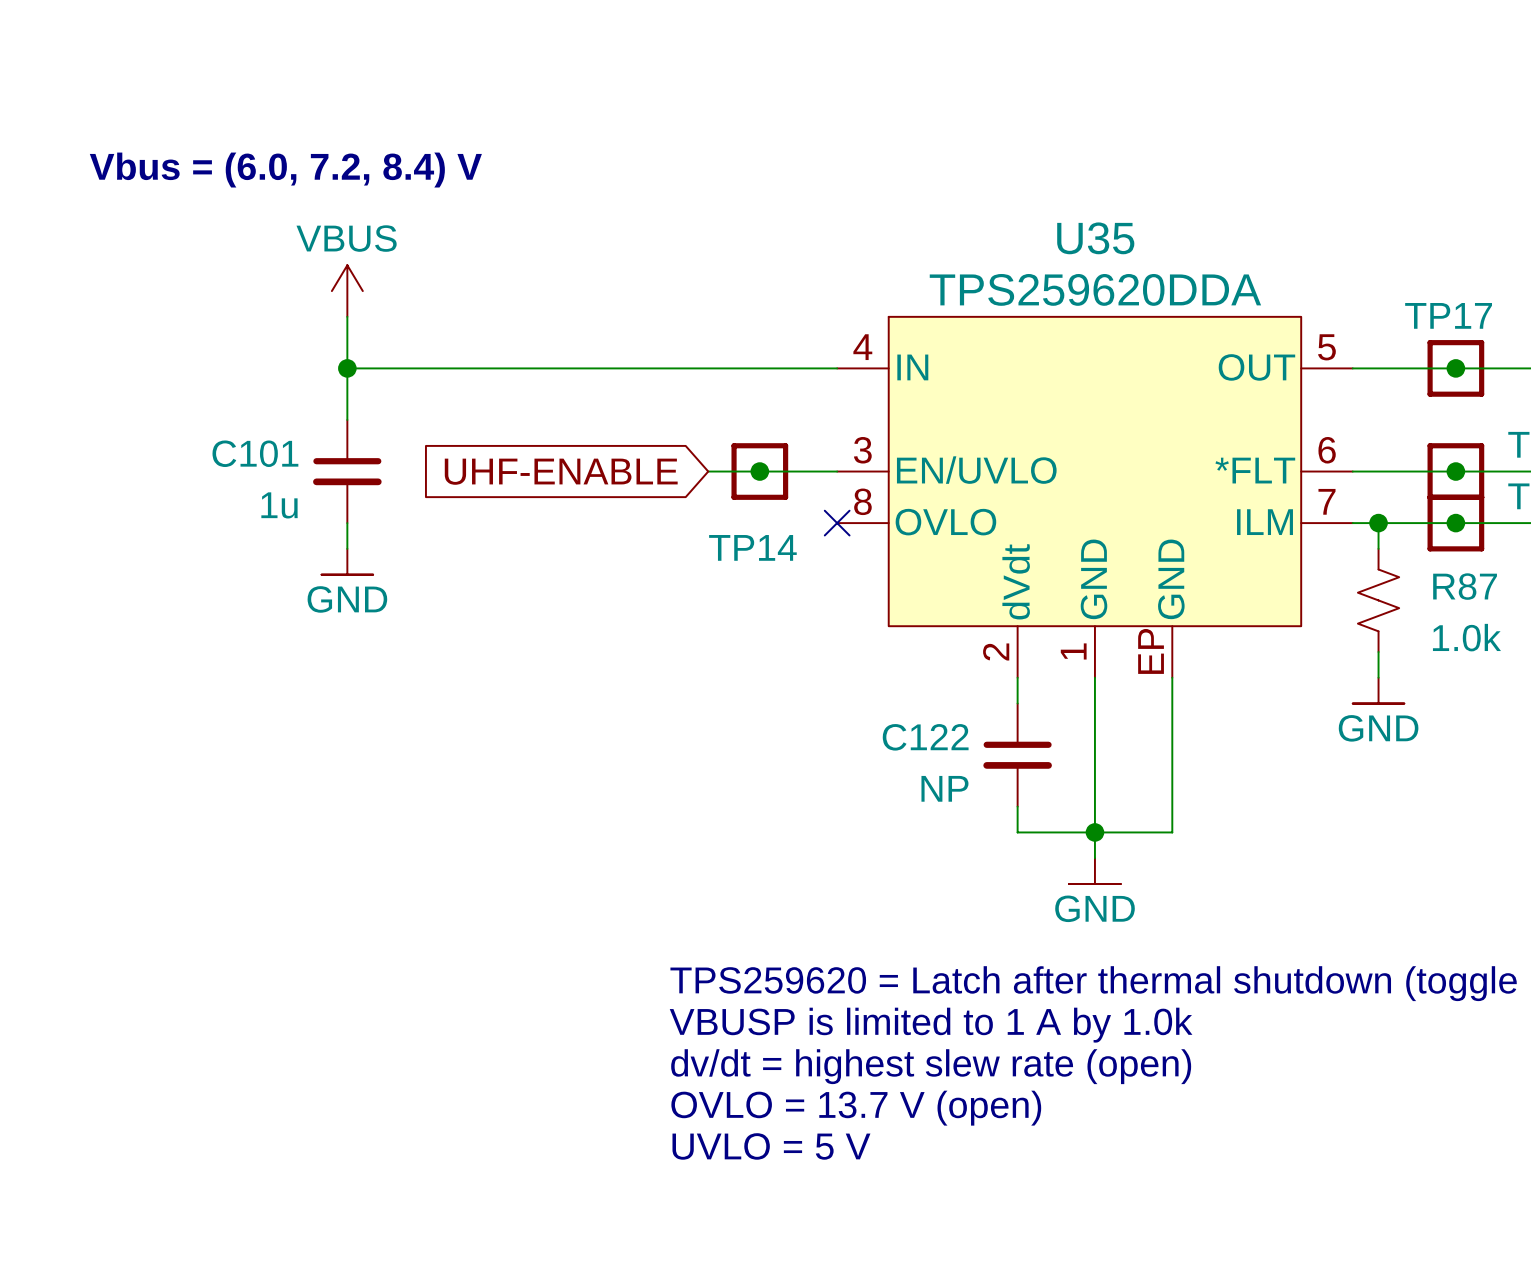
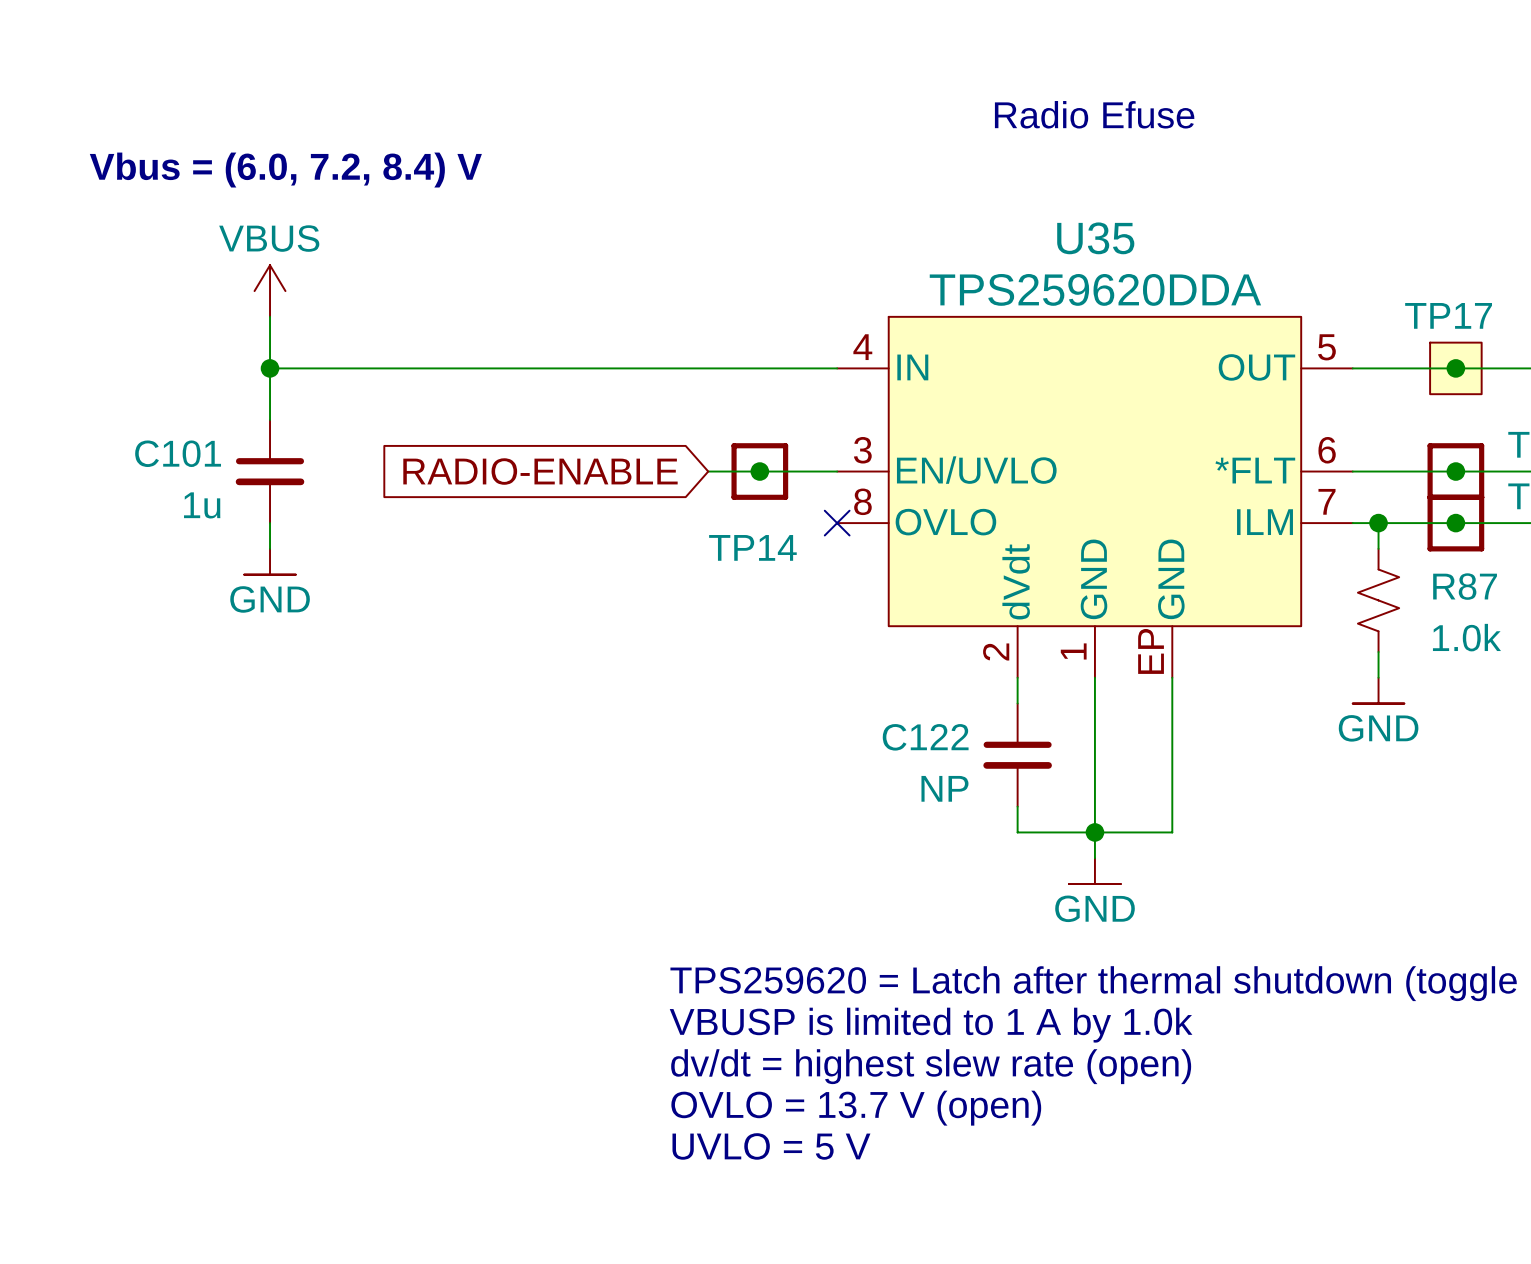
text: none -> Radio Efuse (1094, 114)
power symbol position: VBUS (347, 291) -> VBUS (270, 291)
wire: (347, 316) (347, 419) -> (270, 316) (270, 419)
TP17 symbol: [1427, 340, 1485, 397] -> [1430, 342, 1482, 395]
wire: none -> (270, 368) (347, 368)
junction position: (347, 368) -> (270, 368)
C101 position: (347, 471) -> (270, 471)
global label: UHF-ENABLE (561, 471) -> RADIO-ENABLE (540, 471)
wire: (347, 523) (347, 548) -> (270, 523) (270, 548)
power symbol position: GND (347, 561) -> GND (270, 561)

